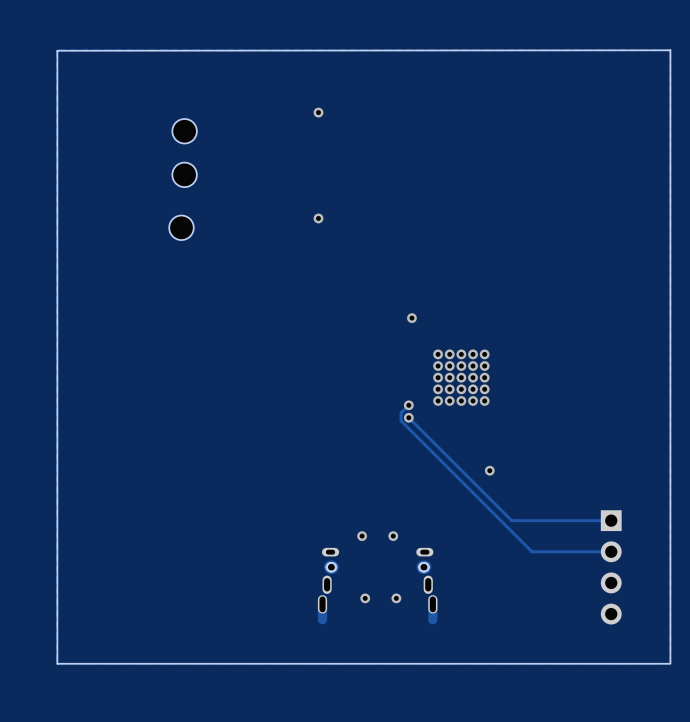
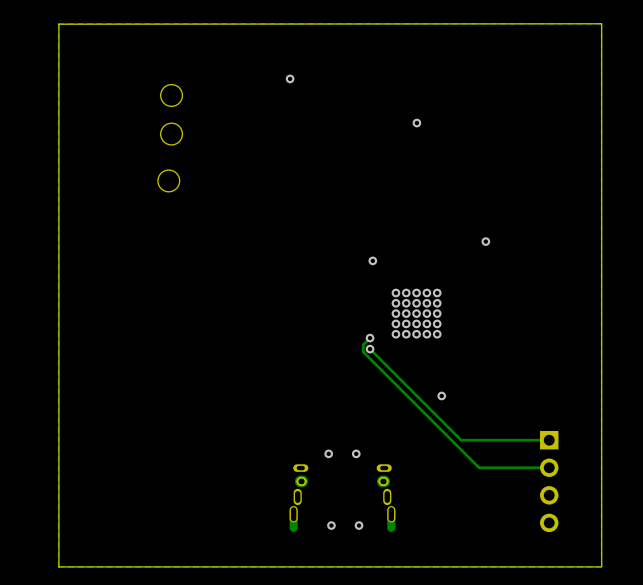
via: none -> (416, 123)
via: (318, 218) -> none
via: none -> (485, 241)
via: (365, 598) -> none
via: (396, 598) -> none
via: none -> (331, 525)
via: none -> (359, 525)

